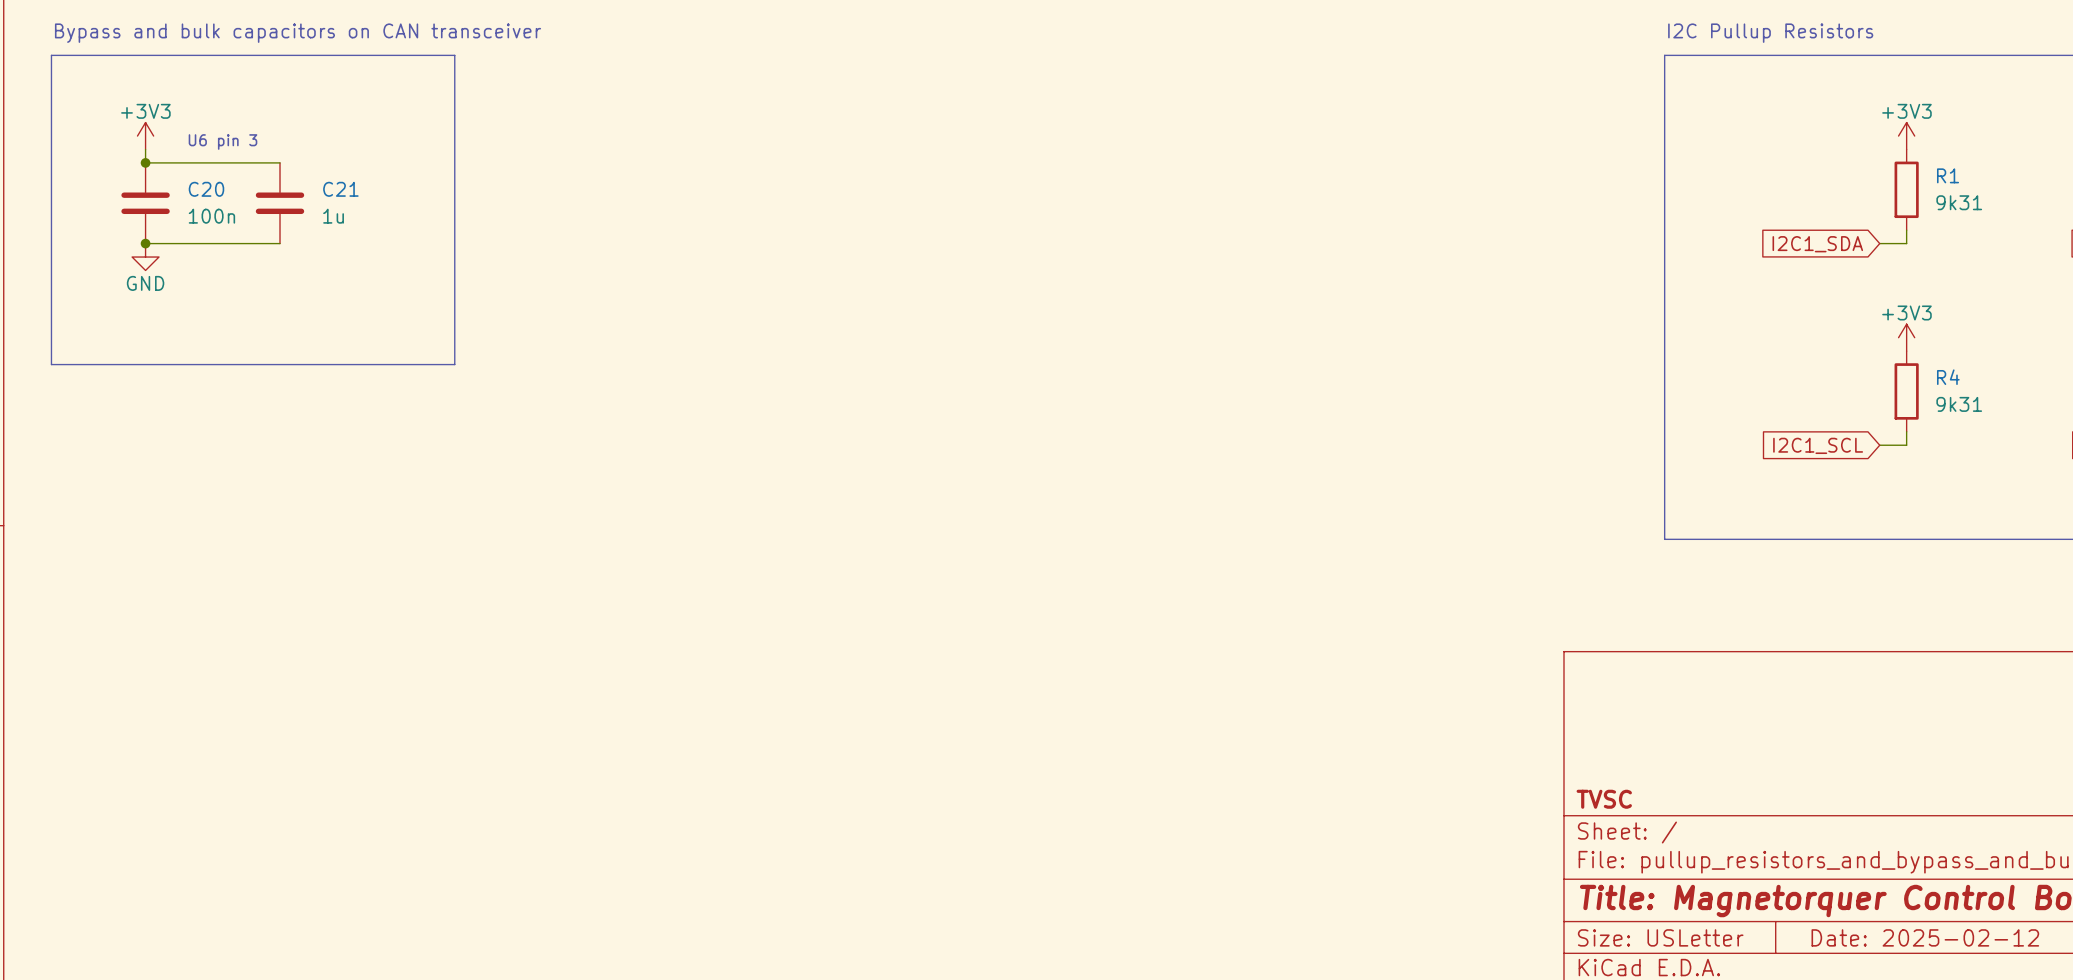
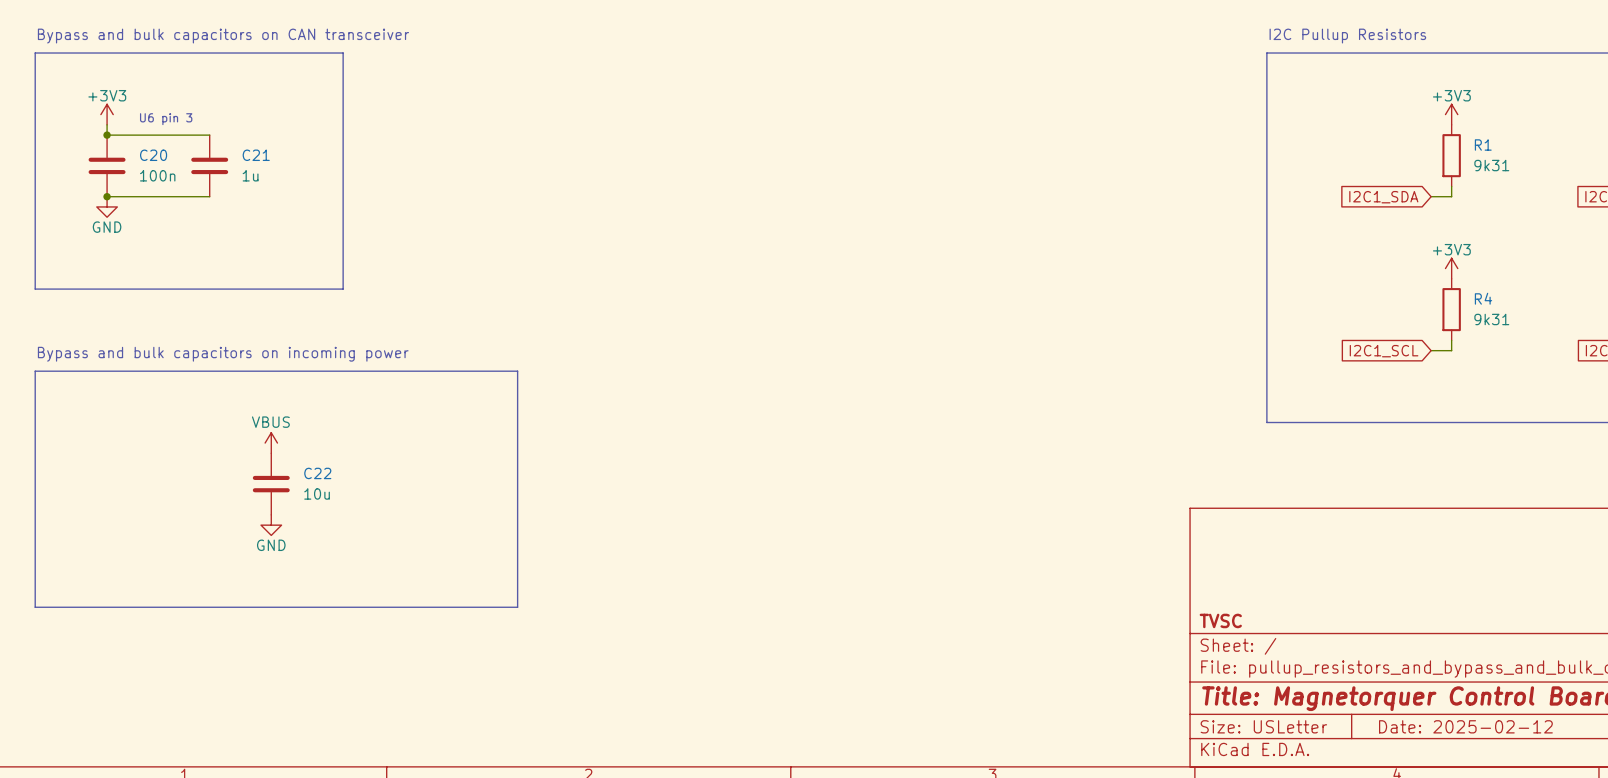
text: none -> Bypass and bulk capacitors on incoming power (223, 354)
line: none -> (35, 371) (517, 371) (517, 607) (35, 607) (35, 371)
power symbol: none -> VBUS (271, 443)
C22: none -> 10u (271, 484)
power symbol: none -> GND (271, 525)

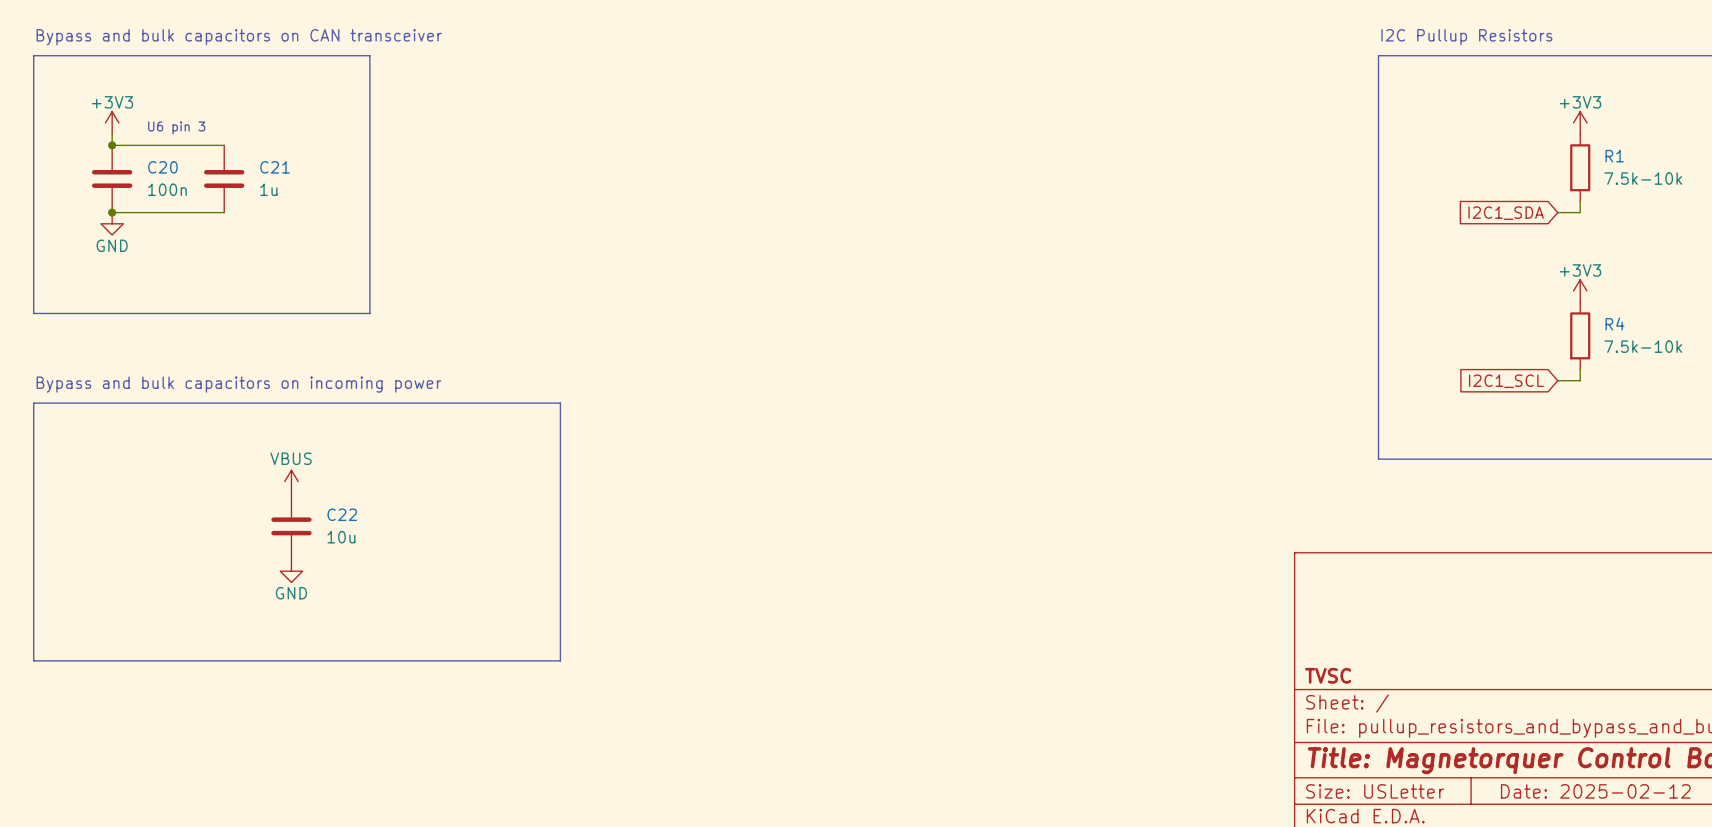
R1 value: 9k31 (1491, 165) -> 7.5k-10k (1643, 178)
R4 value: 9k31 (1491, 319) -> 7.5k-10k (1643, 346)

